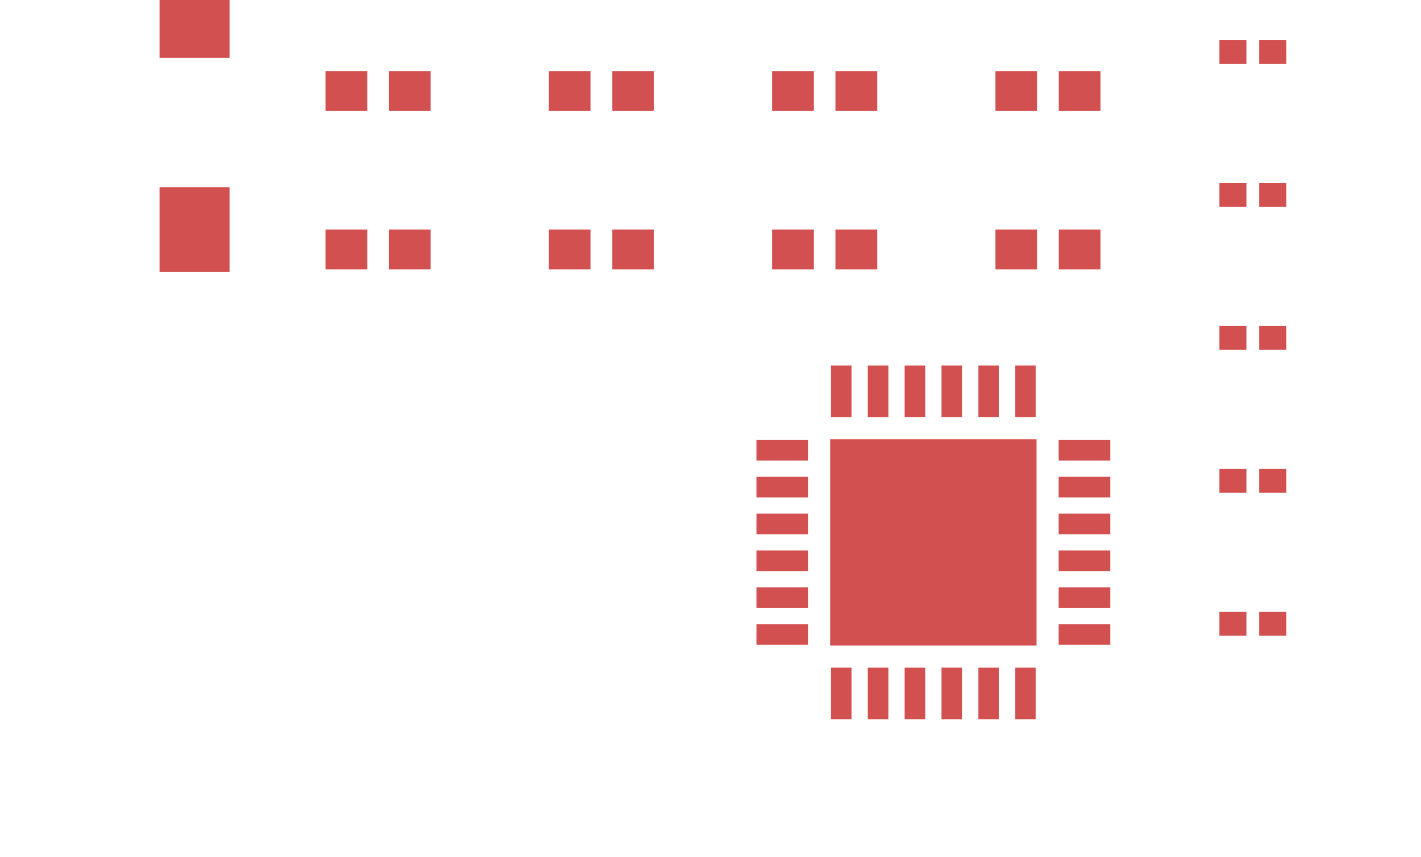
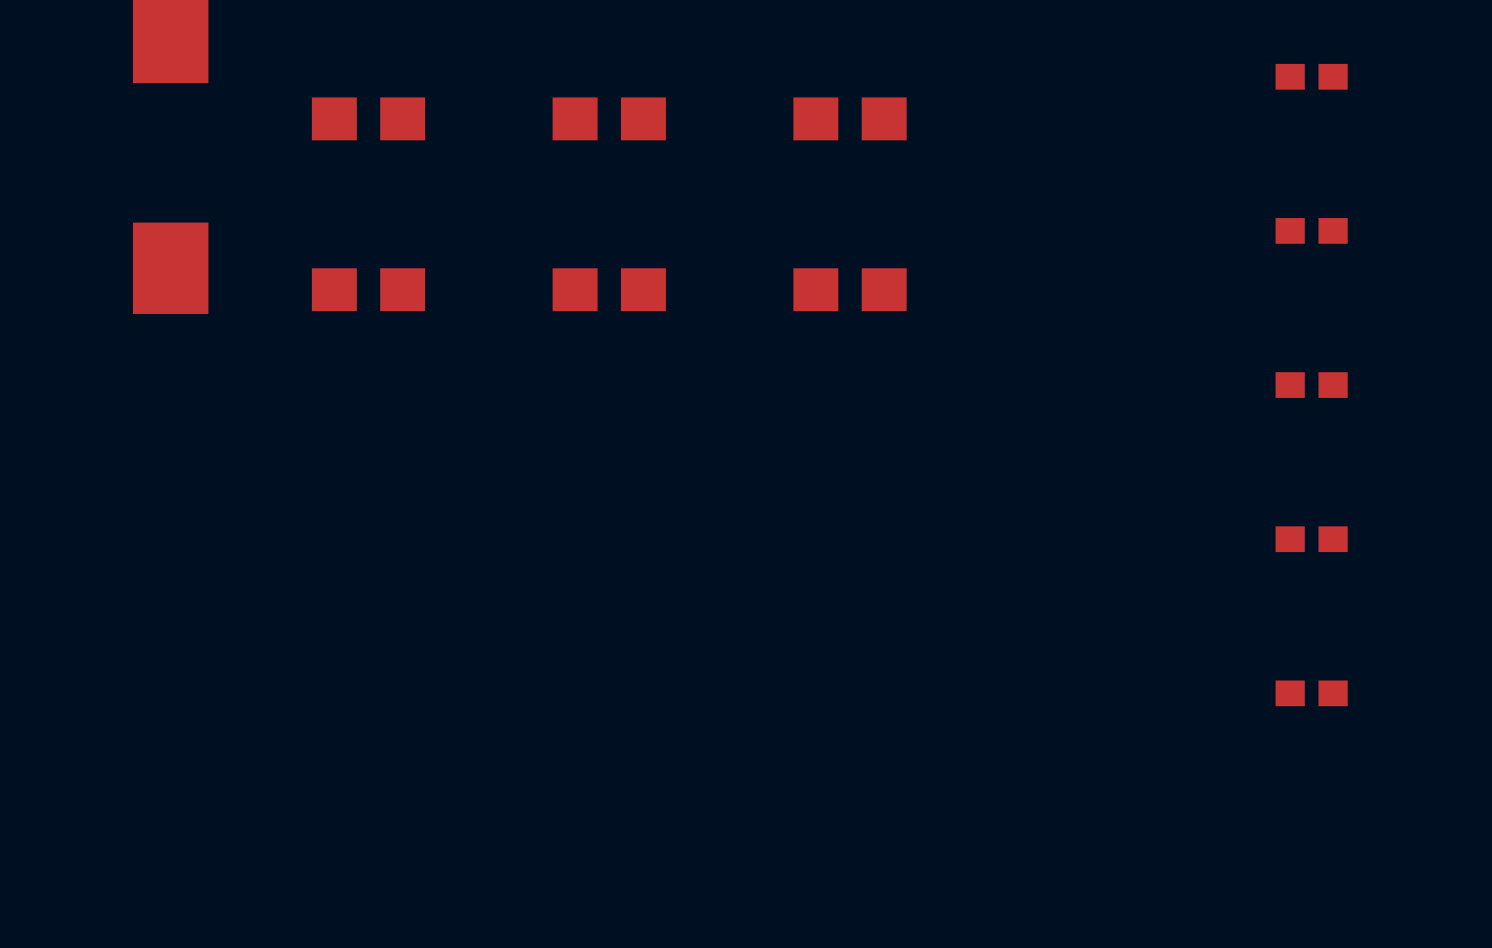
part: (1047, 91) -> none
part: (1047, 249) -> none
part: (933, 542) -> none

